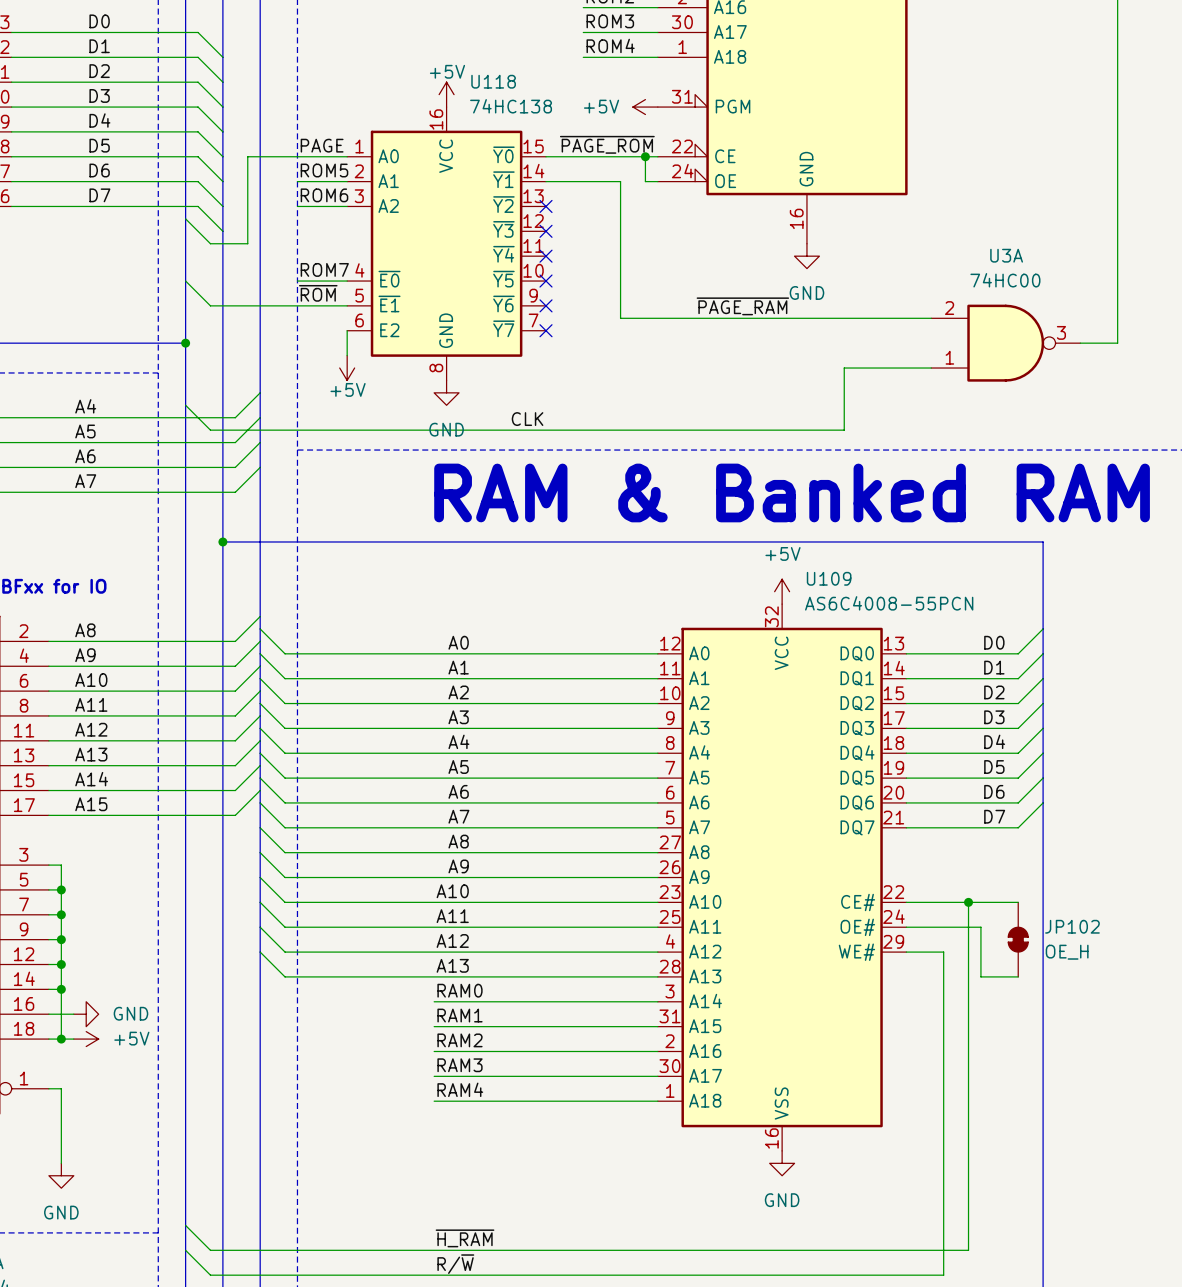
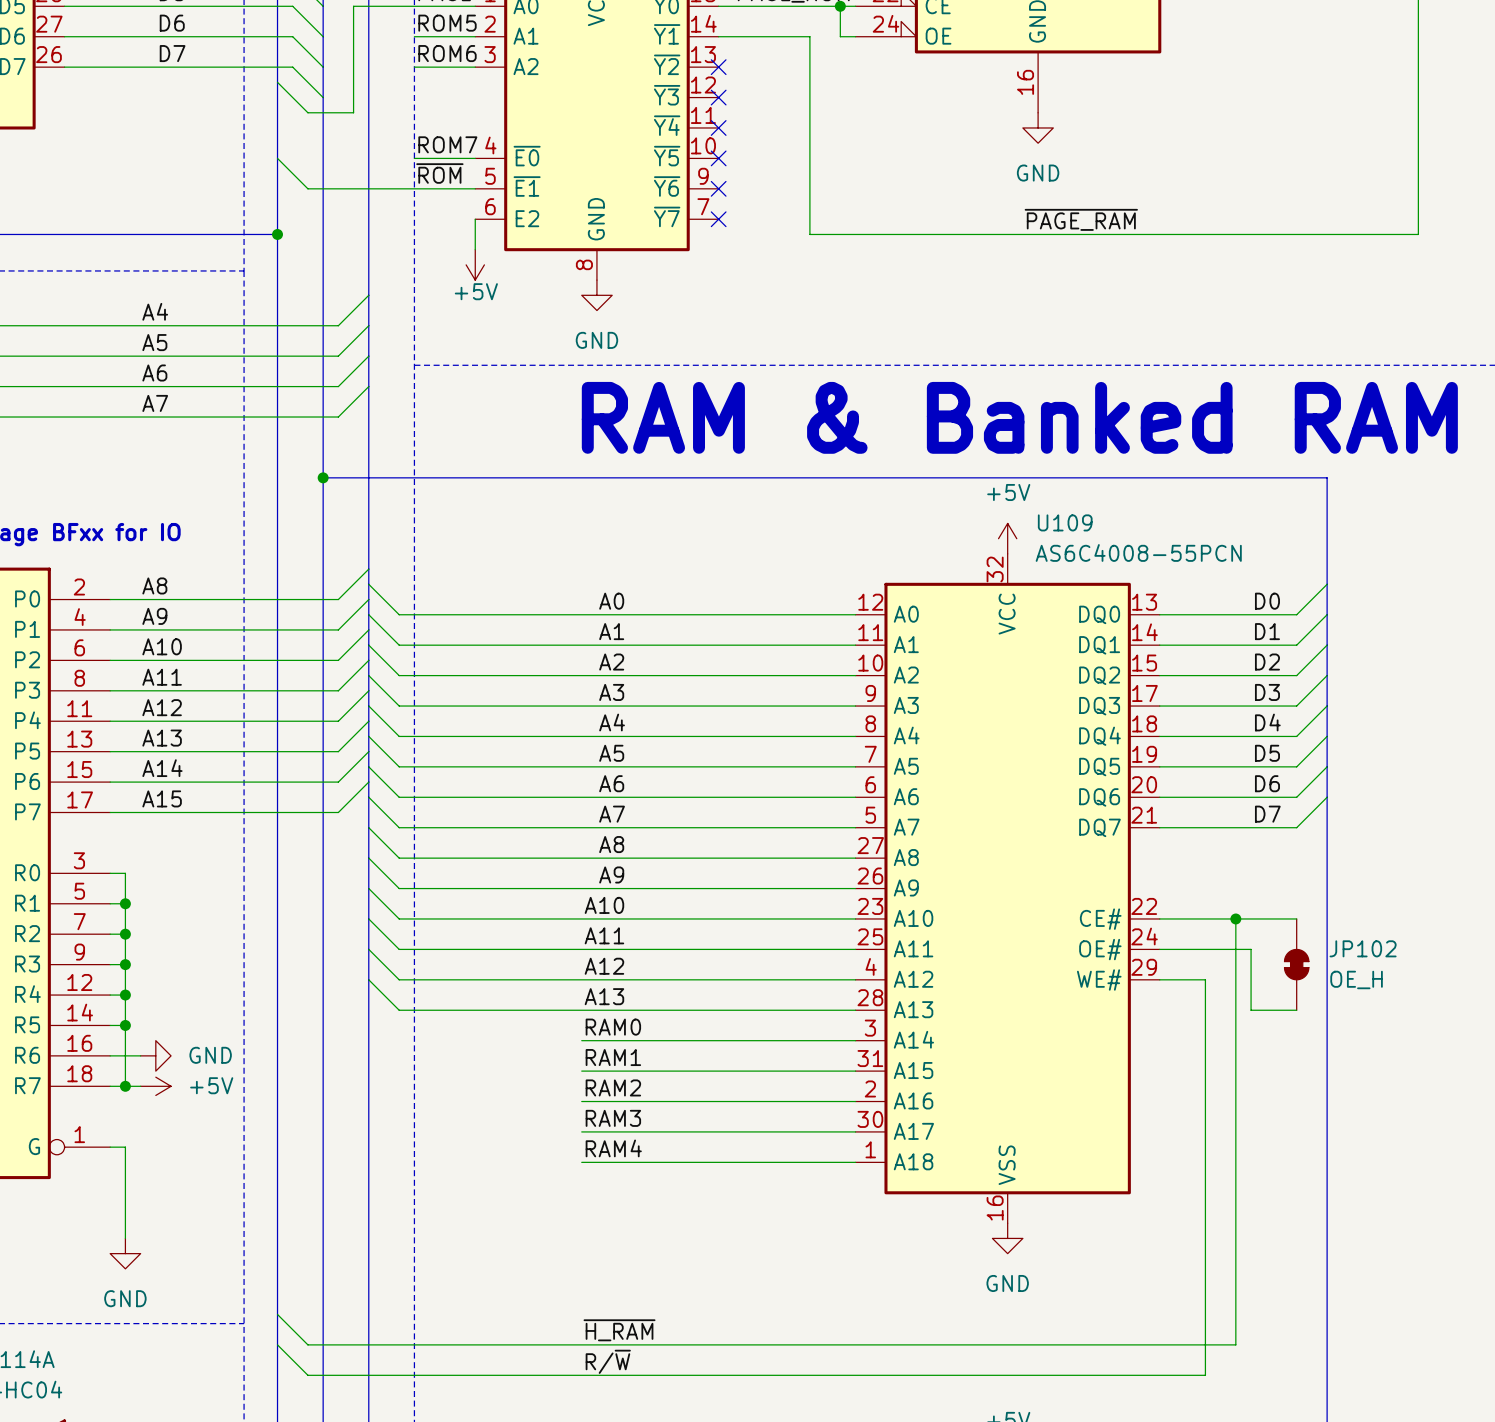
label position: ~{PAGE_RAM} (742, 306) -> ~{PAGE_RAM} (1081, 219)
wire: (620, 318) (931, 318) -> (809, 204) (809, 234) (1372, 234)
U3A: 74HC00 (1005, 343) -> none
wire: (931, 368) (844, 368) (844, 430) (210, 430) (185, 405) -> none
label: CLK (527, 419) -> none

